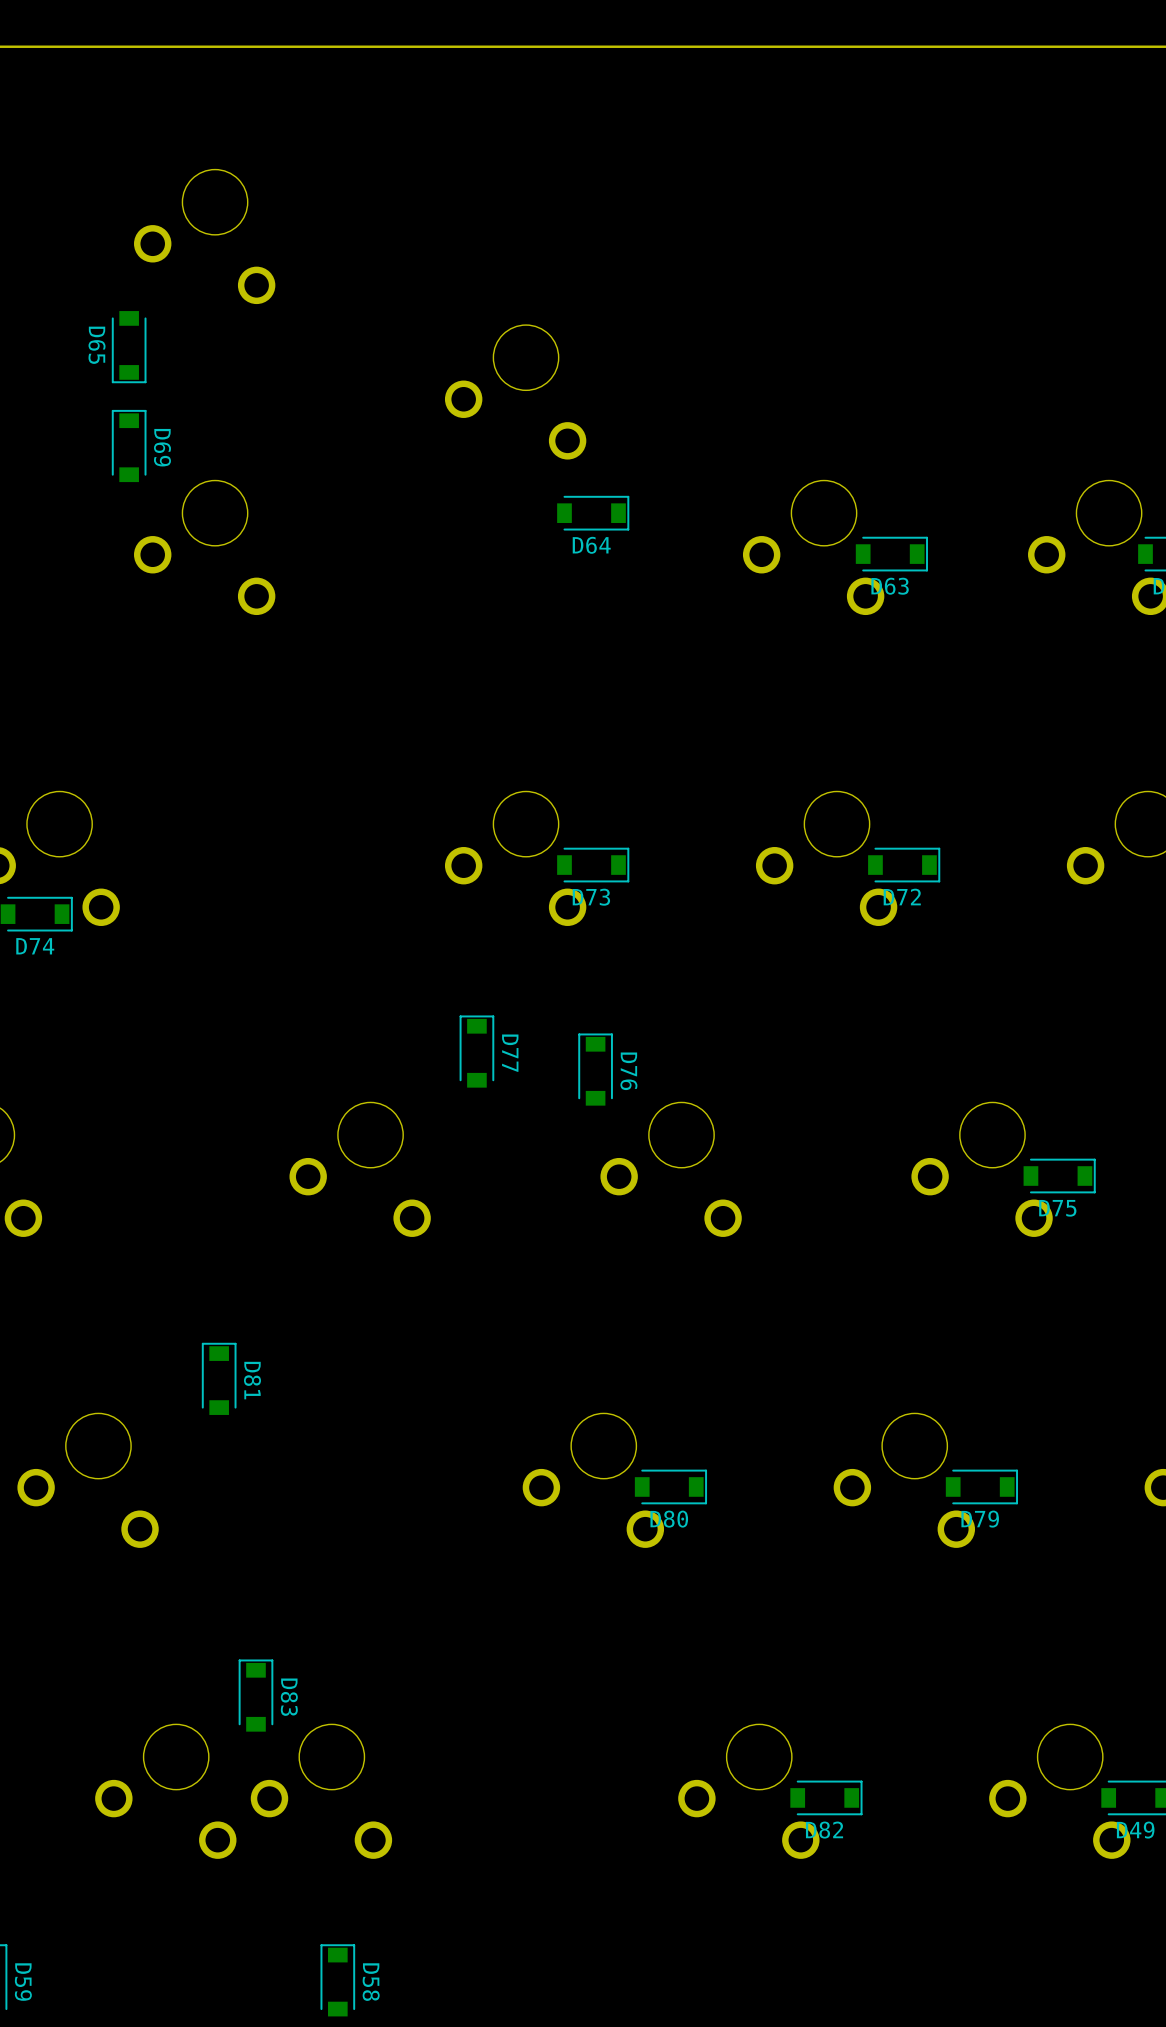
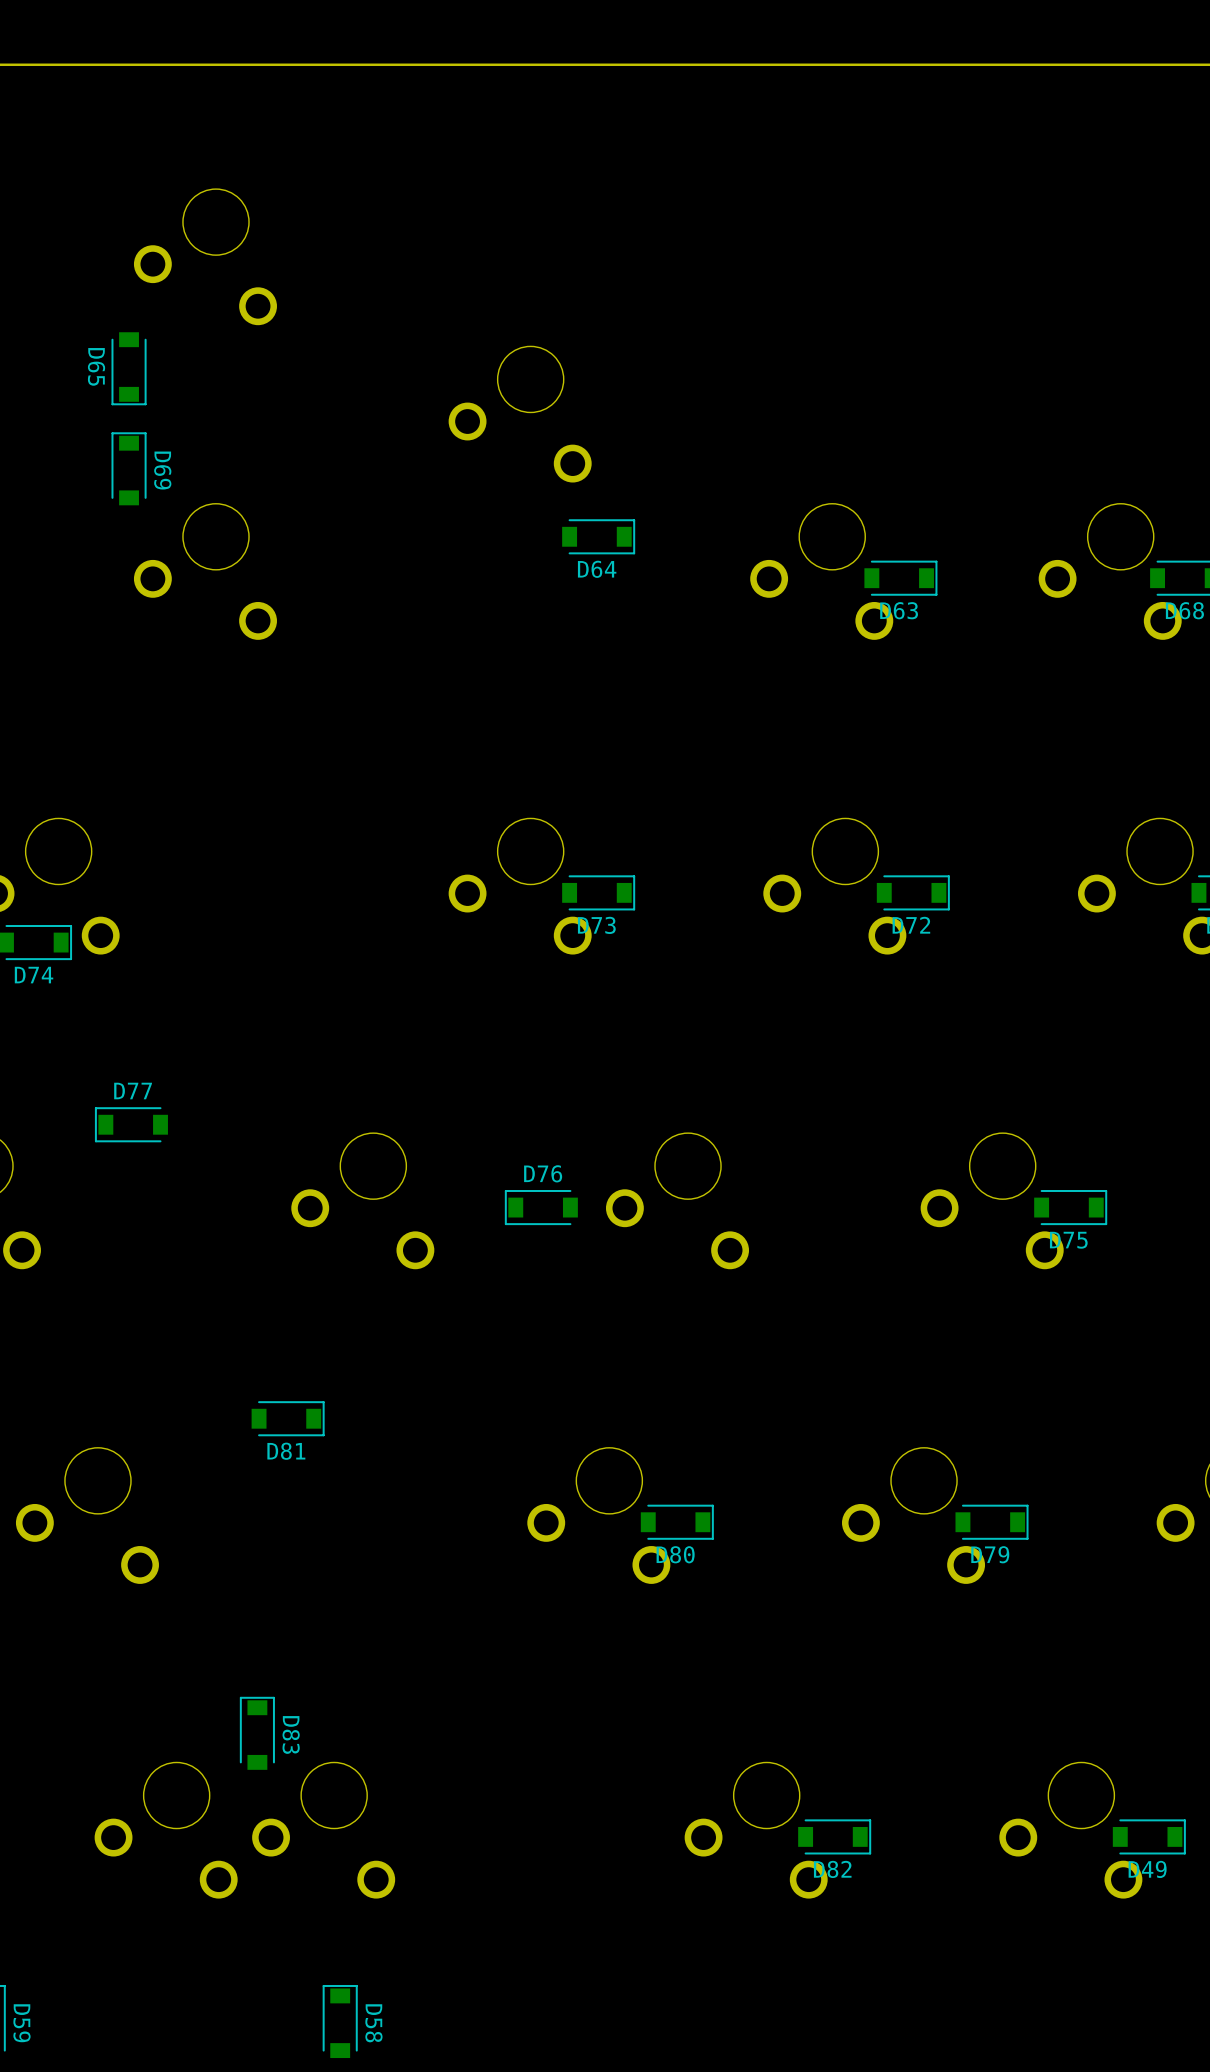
D77 rotation: 0° (476, 1051) -> 90° counterclockwise (131, 1124)
D77 position: (476, 1051) -> (131, 1124)
D76 rotation: 0° (595, 1069) -> 90° counterclockwise (541, 1207)
D76 position: (595, 1069) -> (541, 1207)
D81 rotation: 0° (219, 1378) -> 90° clockwise (288, 1418)
D81 position: (219, 1378) -> (288, 1418)

